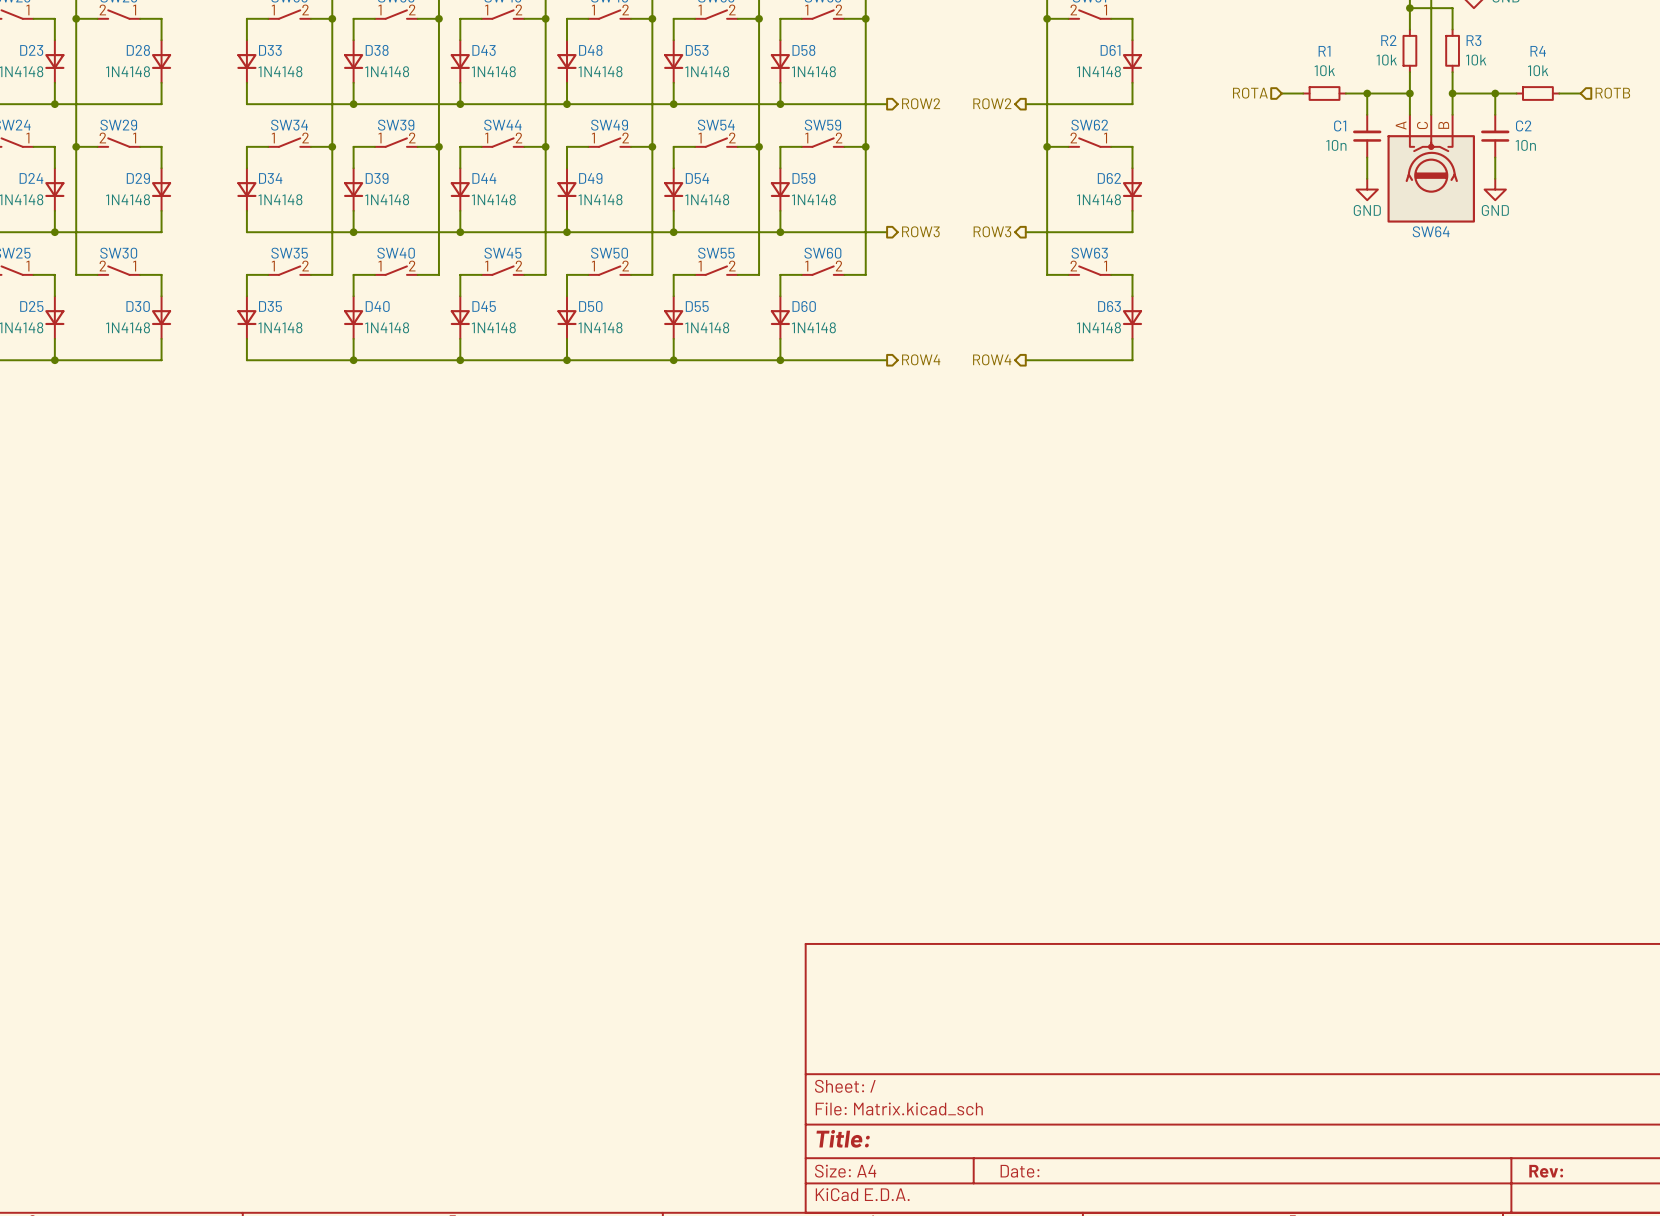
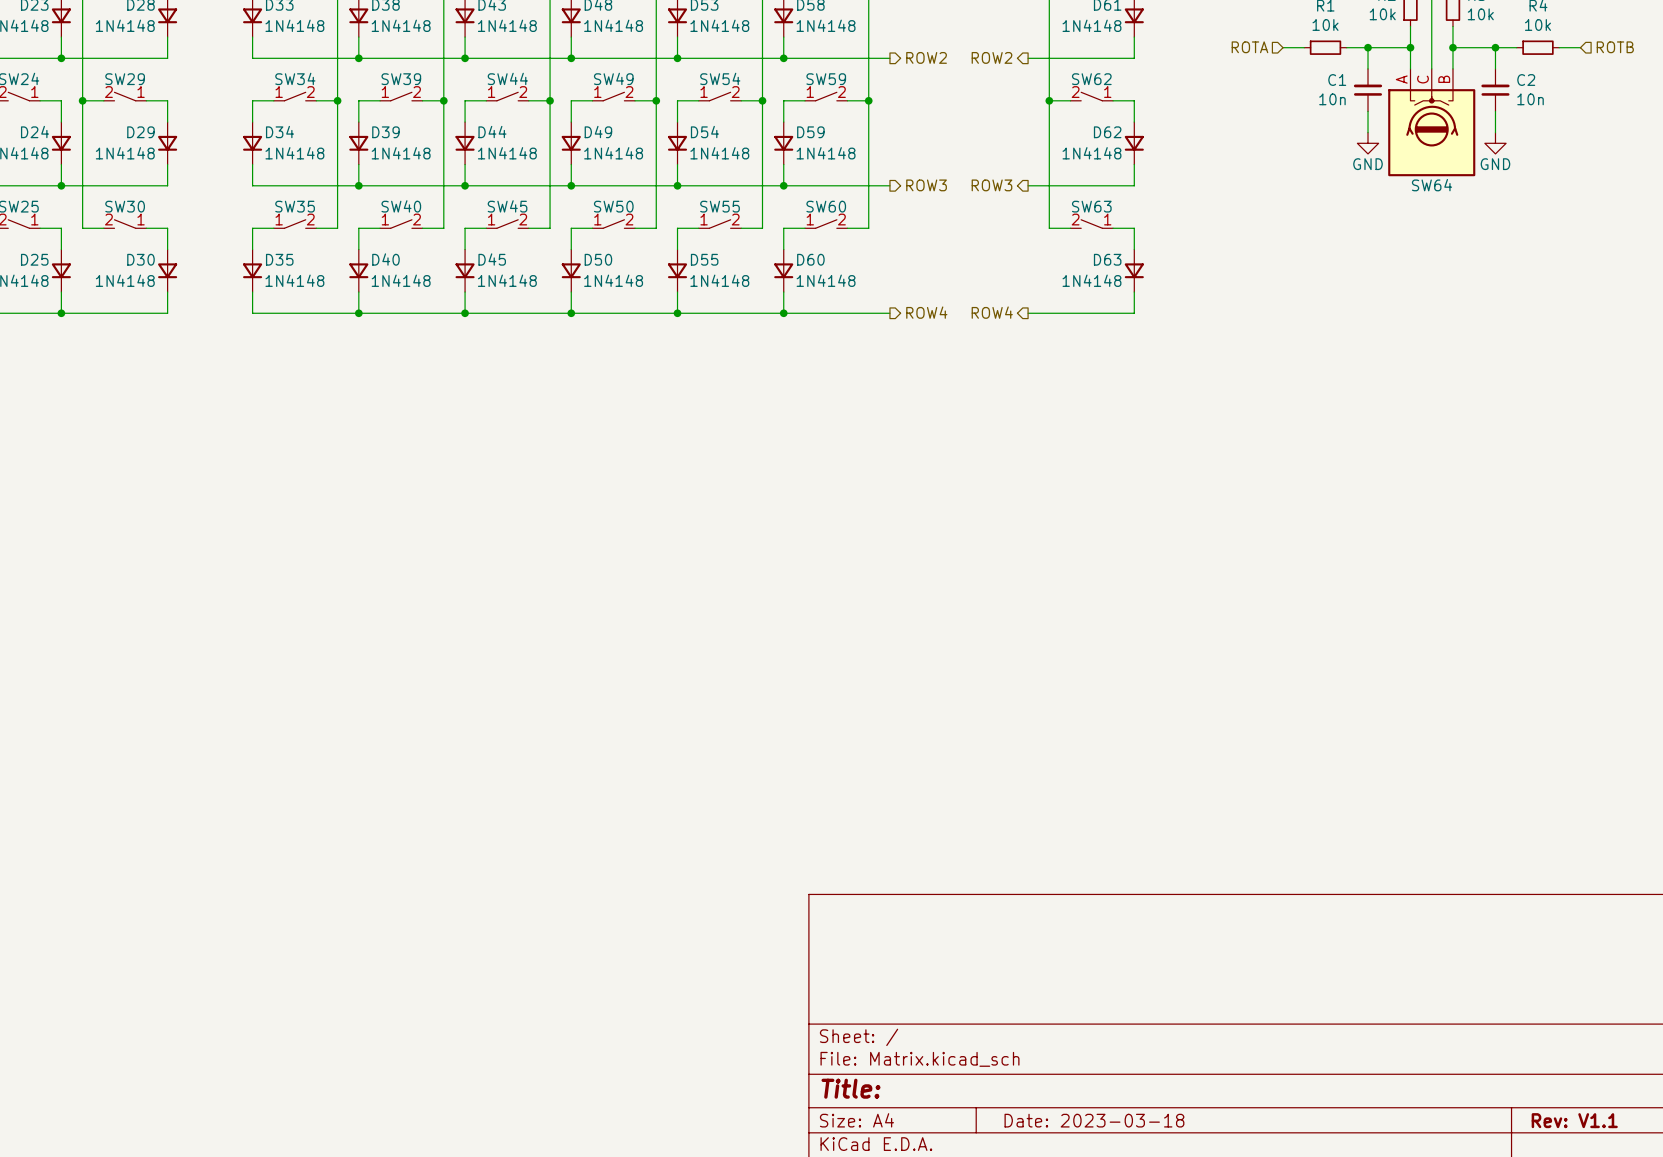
title block: Date: (1020, 1171) -> Date: 2023-03-18 (1094, 1120)
title block: Rev: (1546, 1171) -> Rev: V1.1 (1574, 1120)

